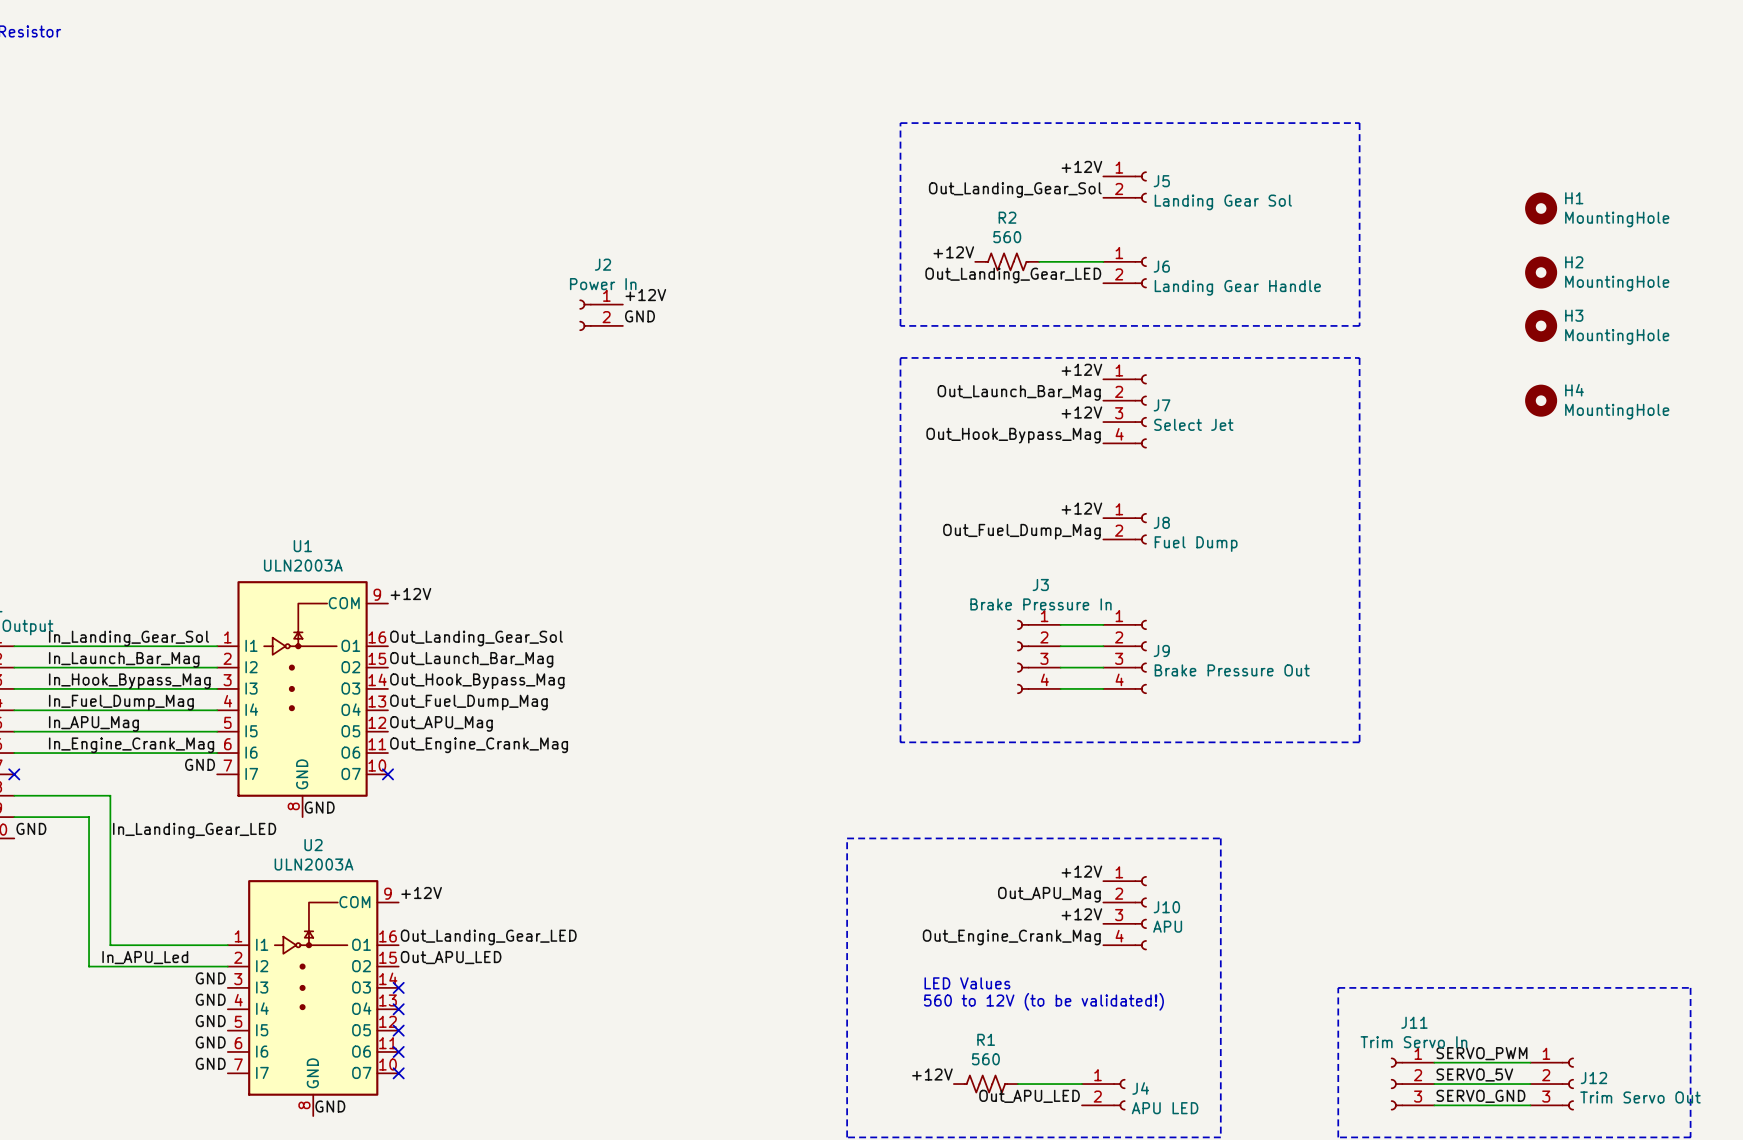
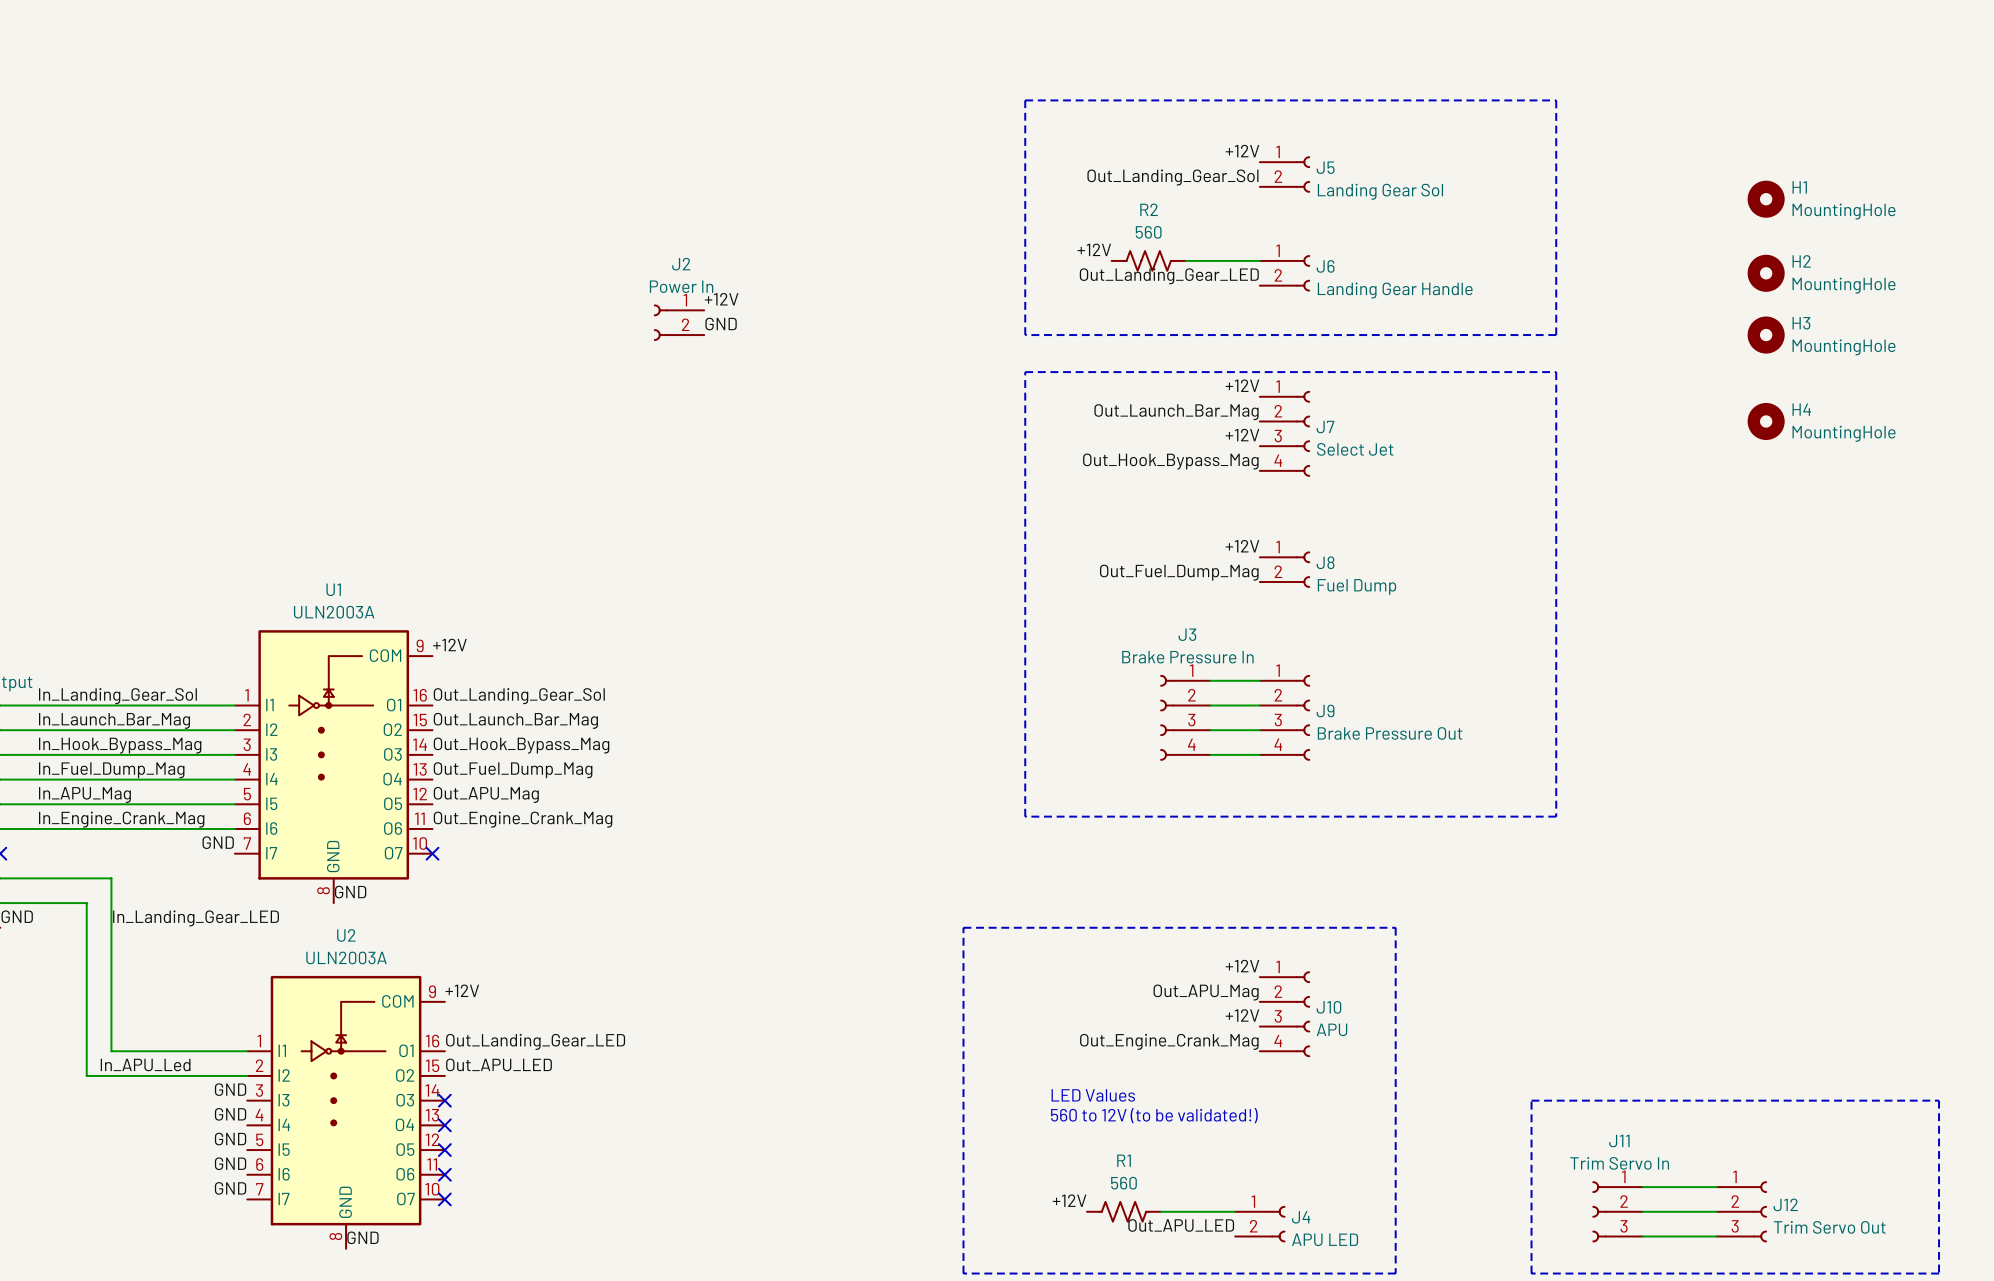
label: SERVO_PWM (1481, 1053) -> none
label: SERVO_5V (1474, 1074) -> none
J12 position: (1552, 1084) -> (1741, 1211)
label: SERVO_GND (1480, 1096) -> none

